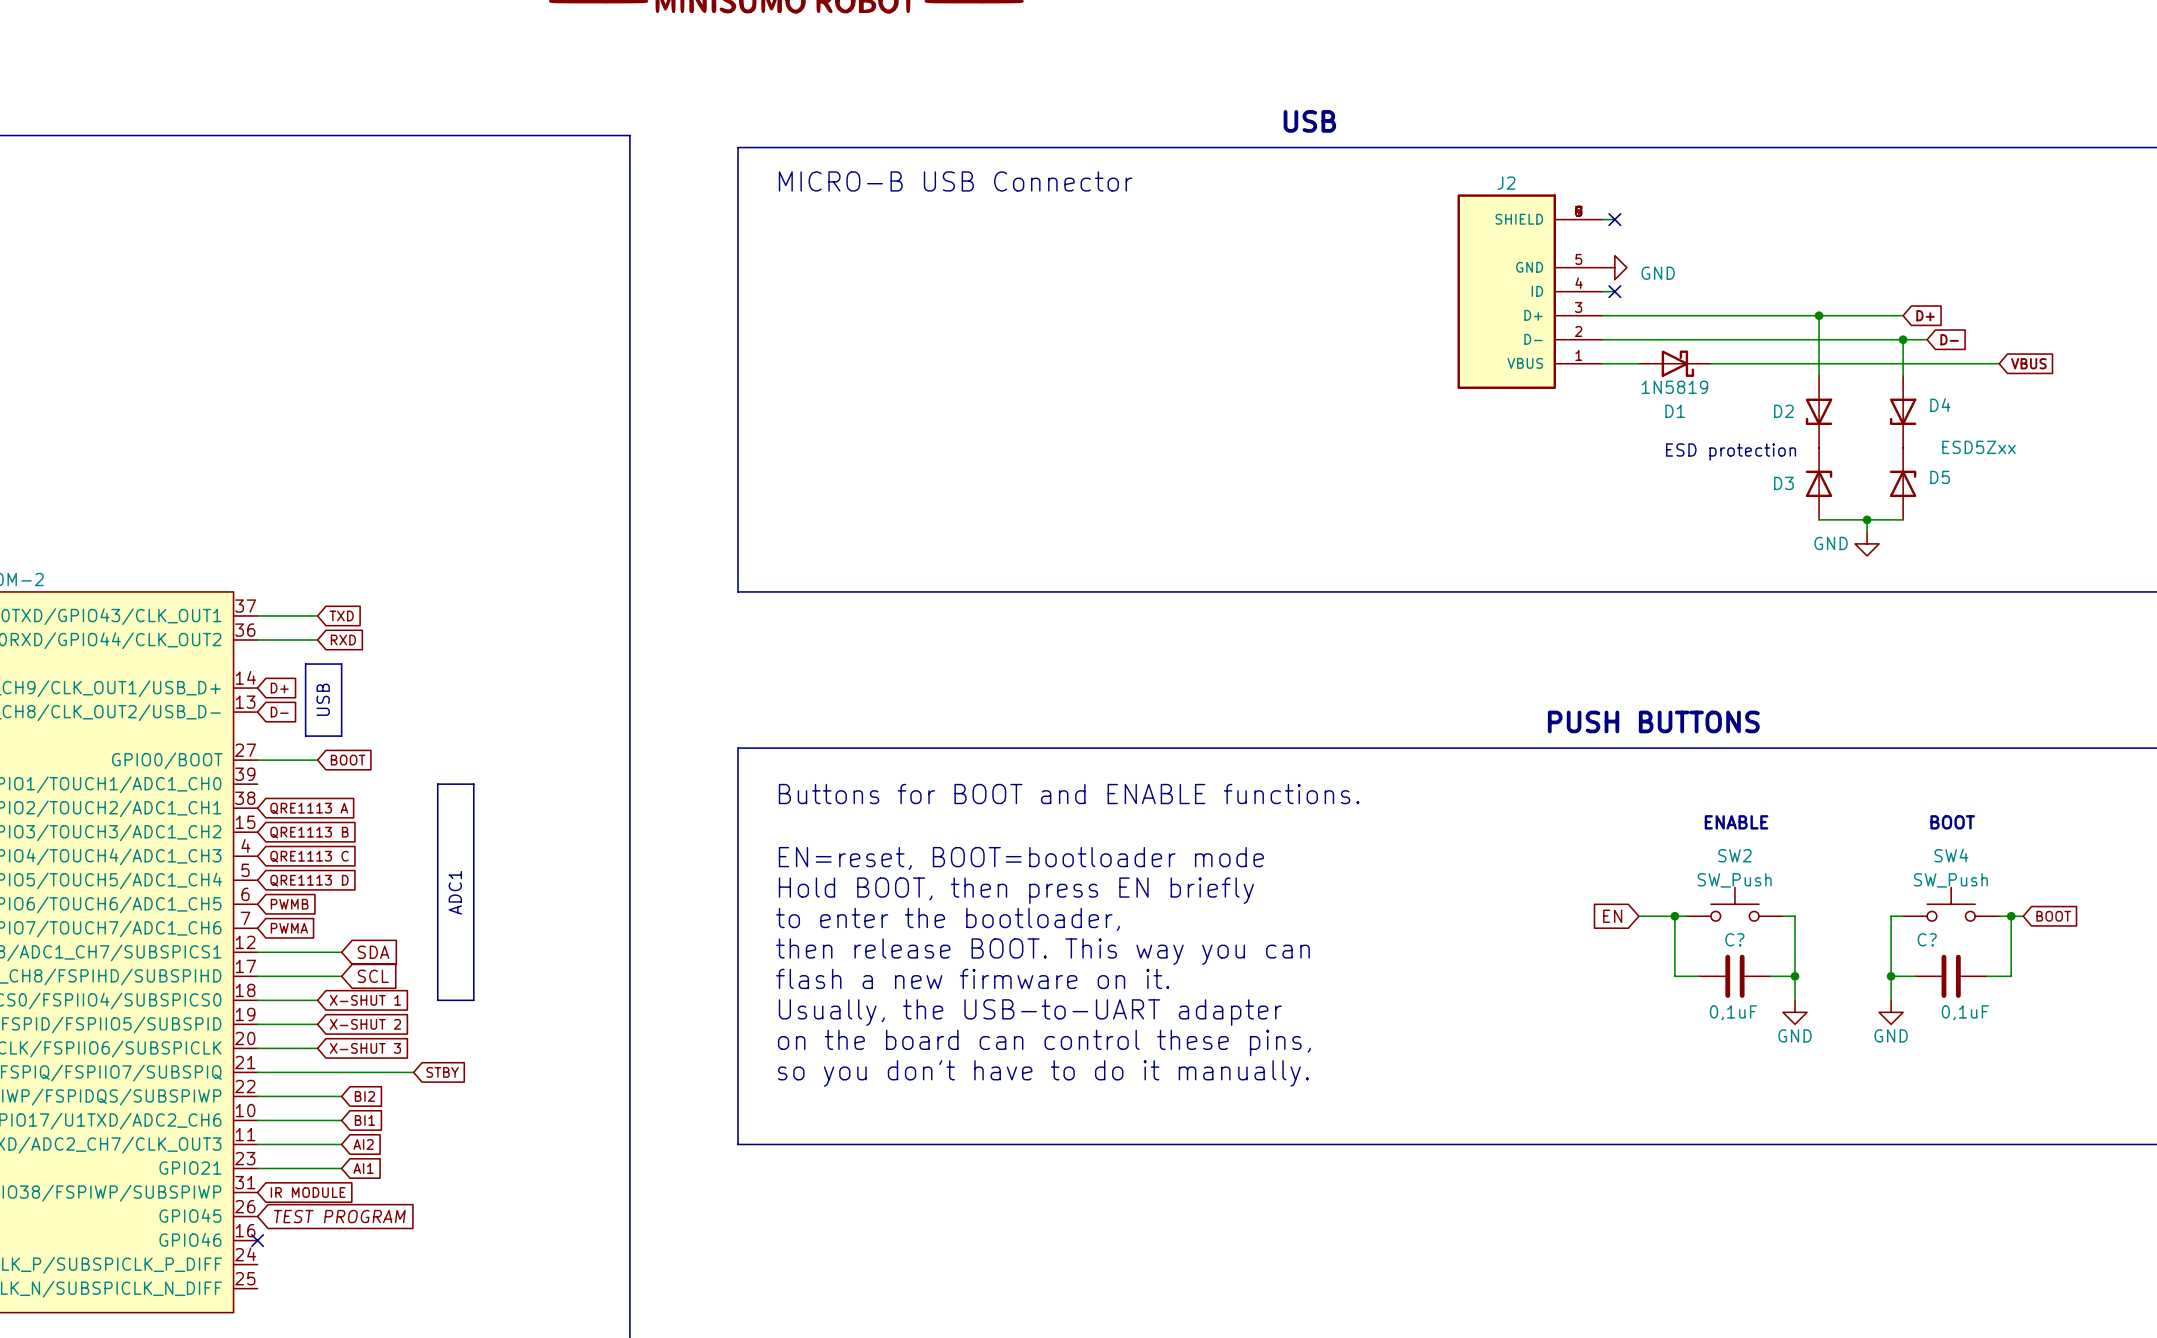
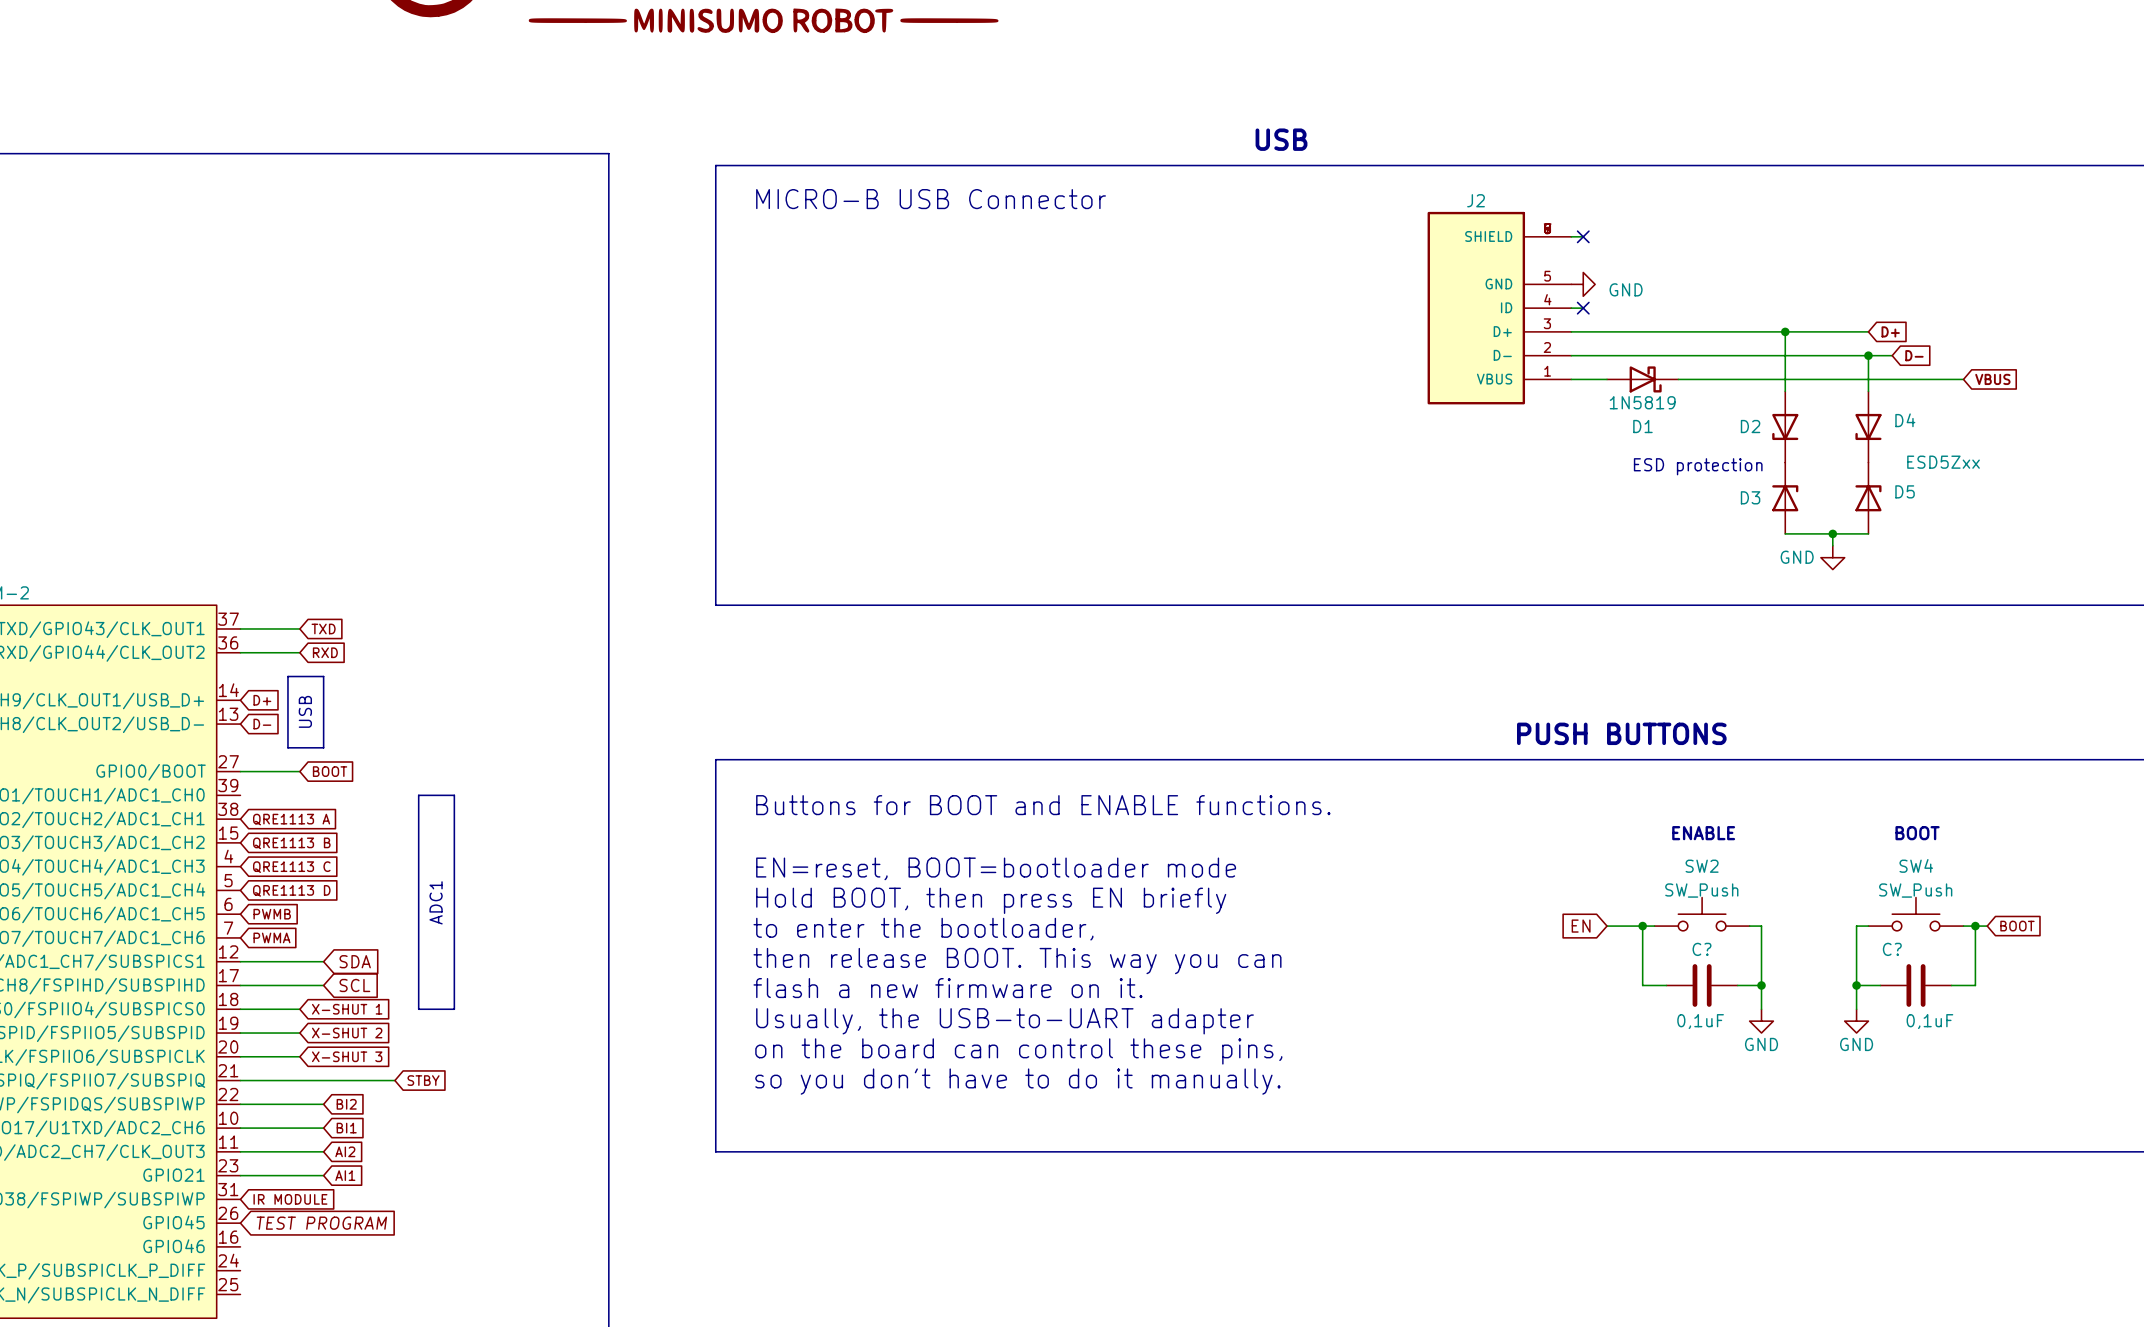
no-connect mark: (257, 1240) -> none

